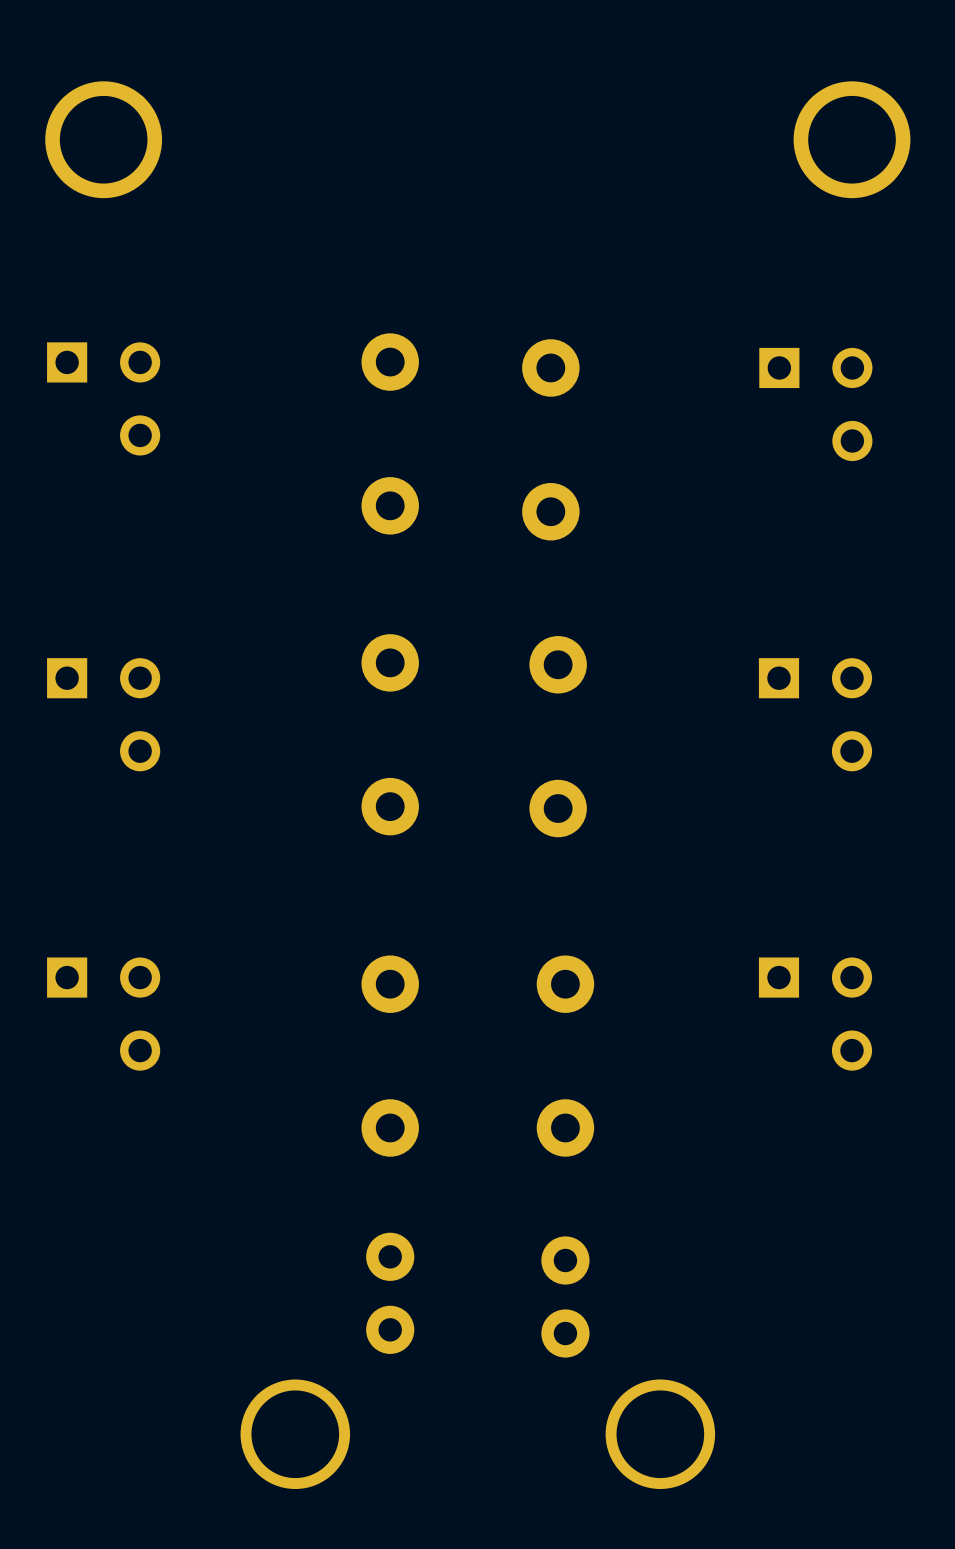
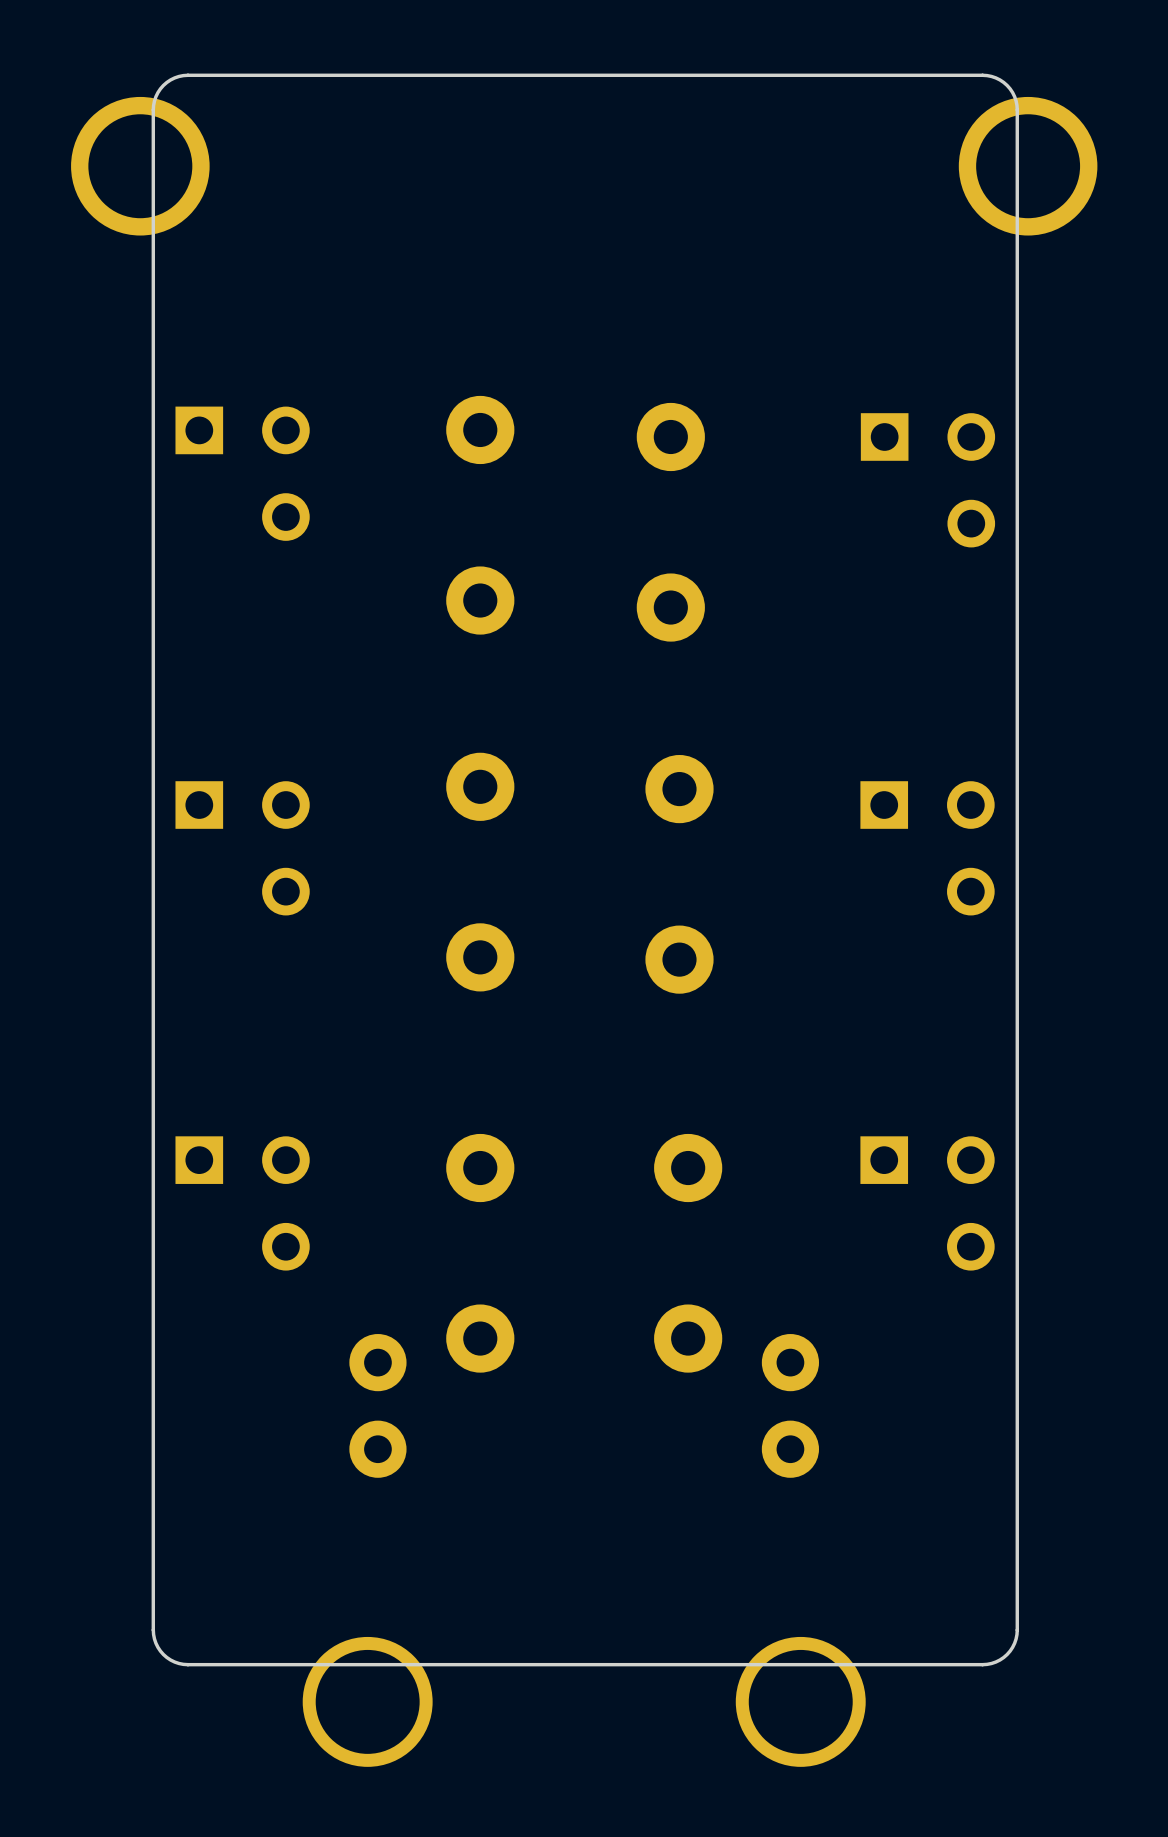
board edge: none -> (982, 75) (187, 75) (170, 79) (157, 92) (153, 109) (153, 1630) (157, 1647) (170, 1660) (187, 1664) (982, 1664) (999, 1660) (1012, 1647) (1017, 1630) (1017, 109) (1014, 96) (1007, 85) (995, 77) (982, 75)
part position: (103, 398) -> (242, 473)
part position: (815, 404) -> (927, 480)
part position: (103, 714) -> (242, 848)
part position: (815, 714) -> (927, 848)
part position: (103, 1014) -> (242, 1203)
part position: (815, 1014) -> (927, 1203)
part: none -> (790, 1405)
part position: (390, 1293) -> (377, 1405)
part: (565, 1296) -> none

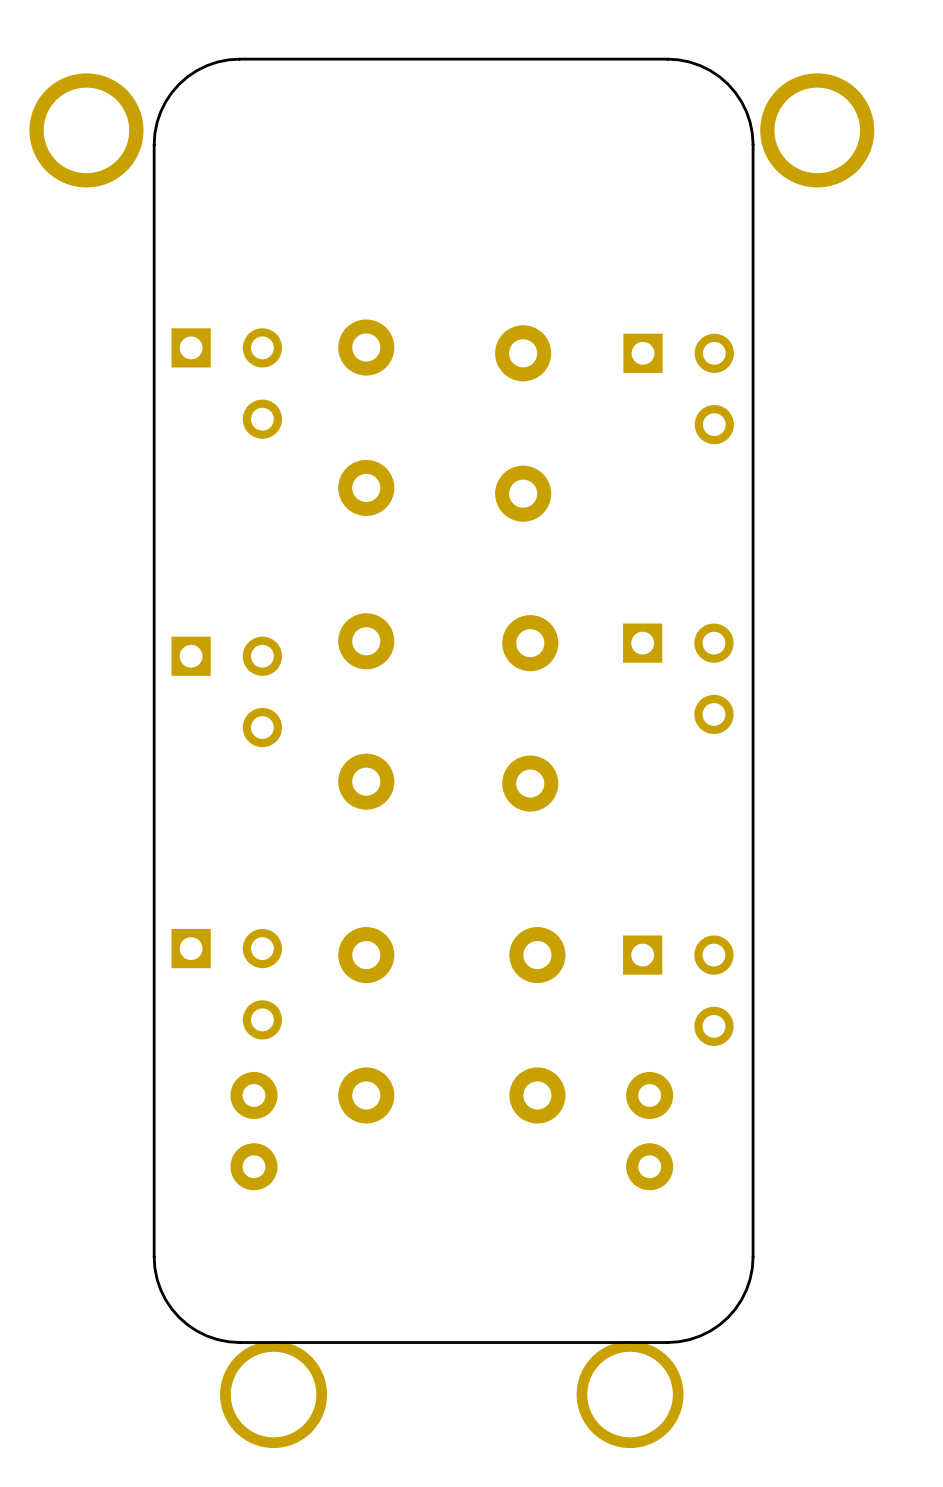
board edge: (982, 75) (187, 75) (170, 79) (157, 92) (153, 109) (153, 1630) (157, 1647) (170, 1660) (187, 1664) (982, 1664) (999, 1660) (1012, 1647) (1017, 1630) (1017, 109) (1014, 96) (1007, 85) (995, 77) (982, 75) -> (667, 59) (700, 65) (728, 84) (746, 111) (753, 144) (753, 1256) (746, 1289) (735, 1309) (719, 1324) (700, 1336) (678, 1341) (239, 1342) (206, 1336) (187, 1324) (171, 1309) (157, 1279) (154, 1256) (154, 144) (160, 111) (171, 92) (187, 76) (206, 65) (228, 59) (667, 59)
part position: (242, 473) -> (226, 383)
part position: (927, 480) -> (678, 388)
part position: (242, 848) -> (226, 691)
part position: (927, 848) -> (678, 678)
part position: (242, 1203) -> (226, 984)
part position: (927, 1203) -> (678, 990)
part position: (377, 1405) -> (253, 1131)
part position: (790, 1405) -> (649, 1131)

